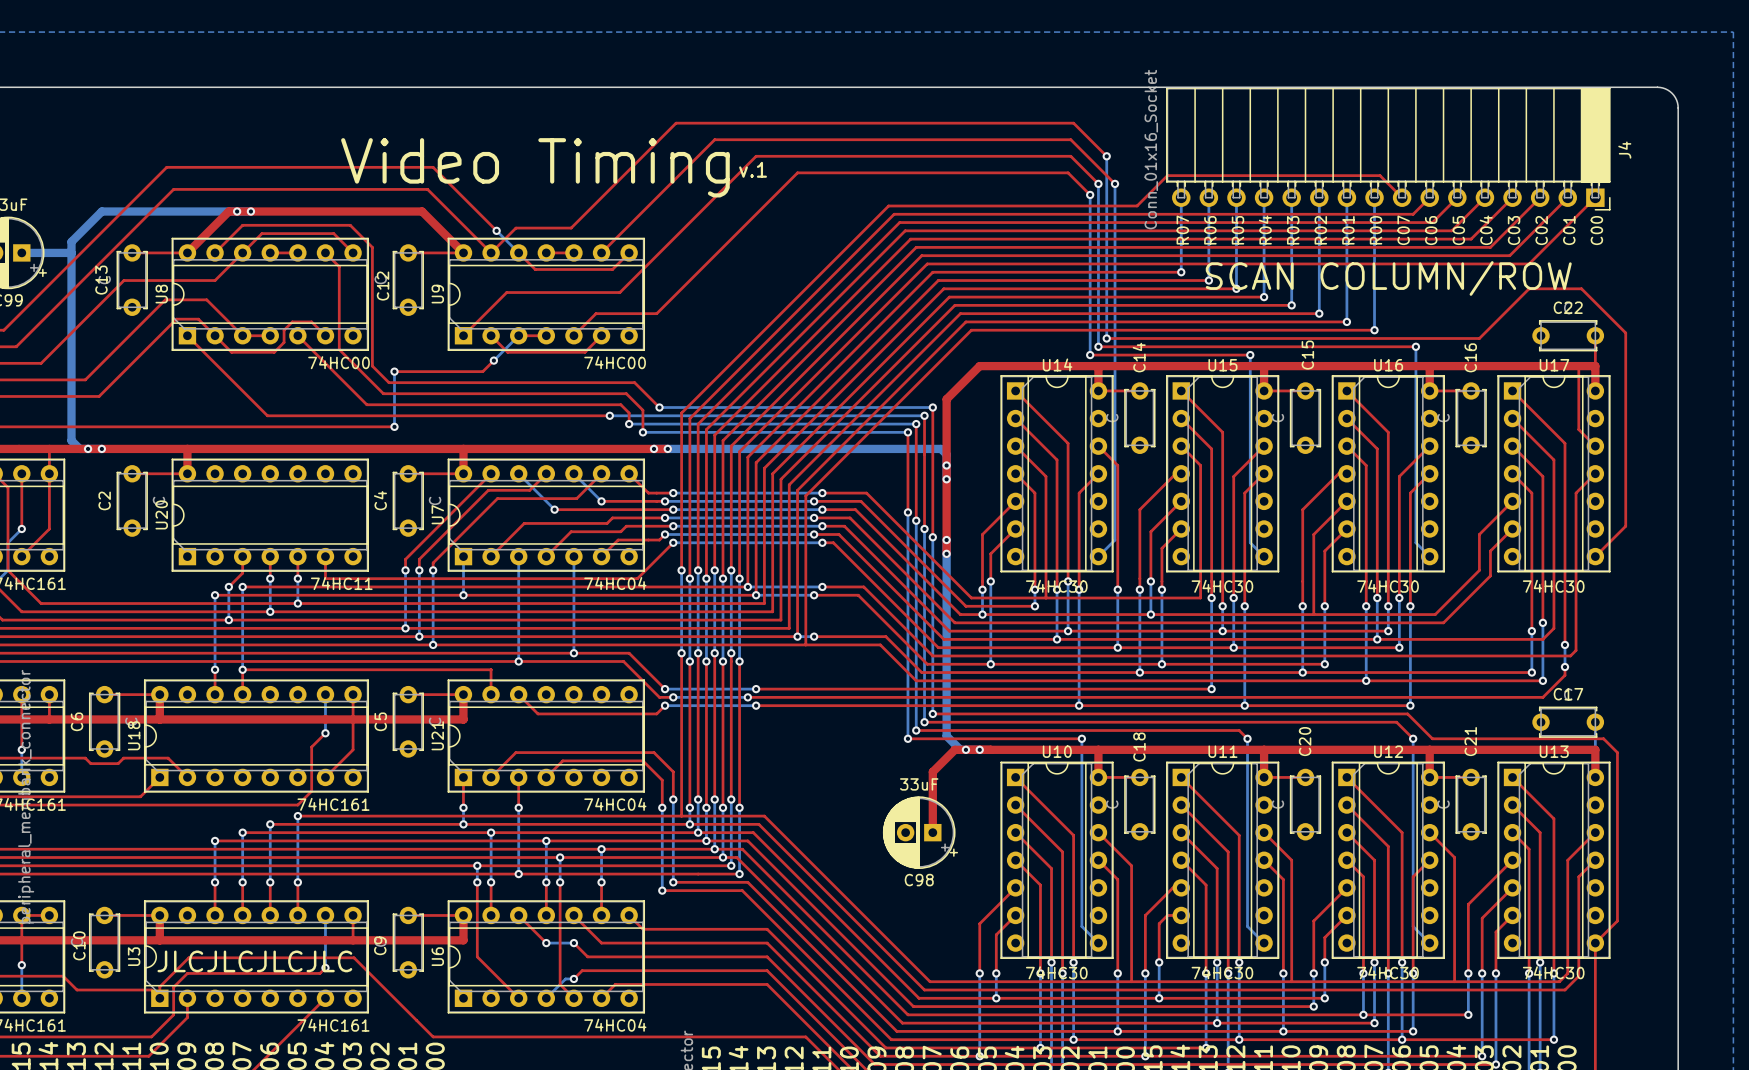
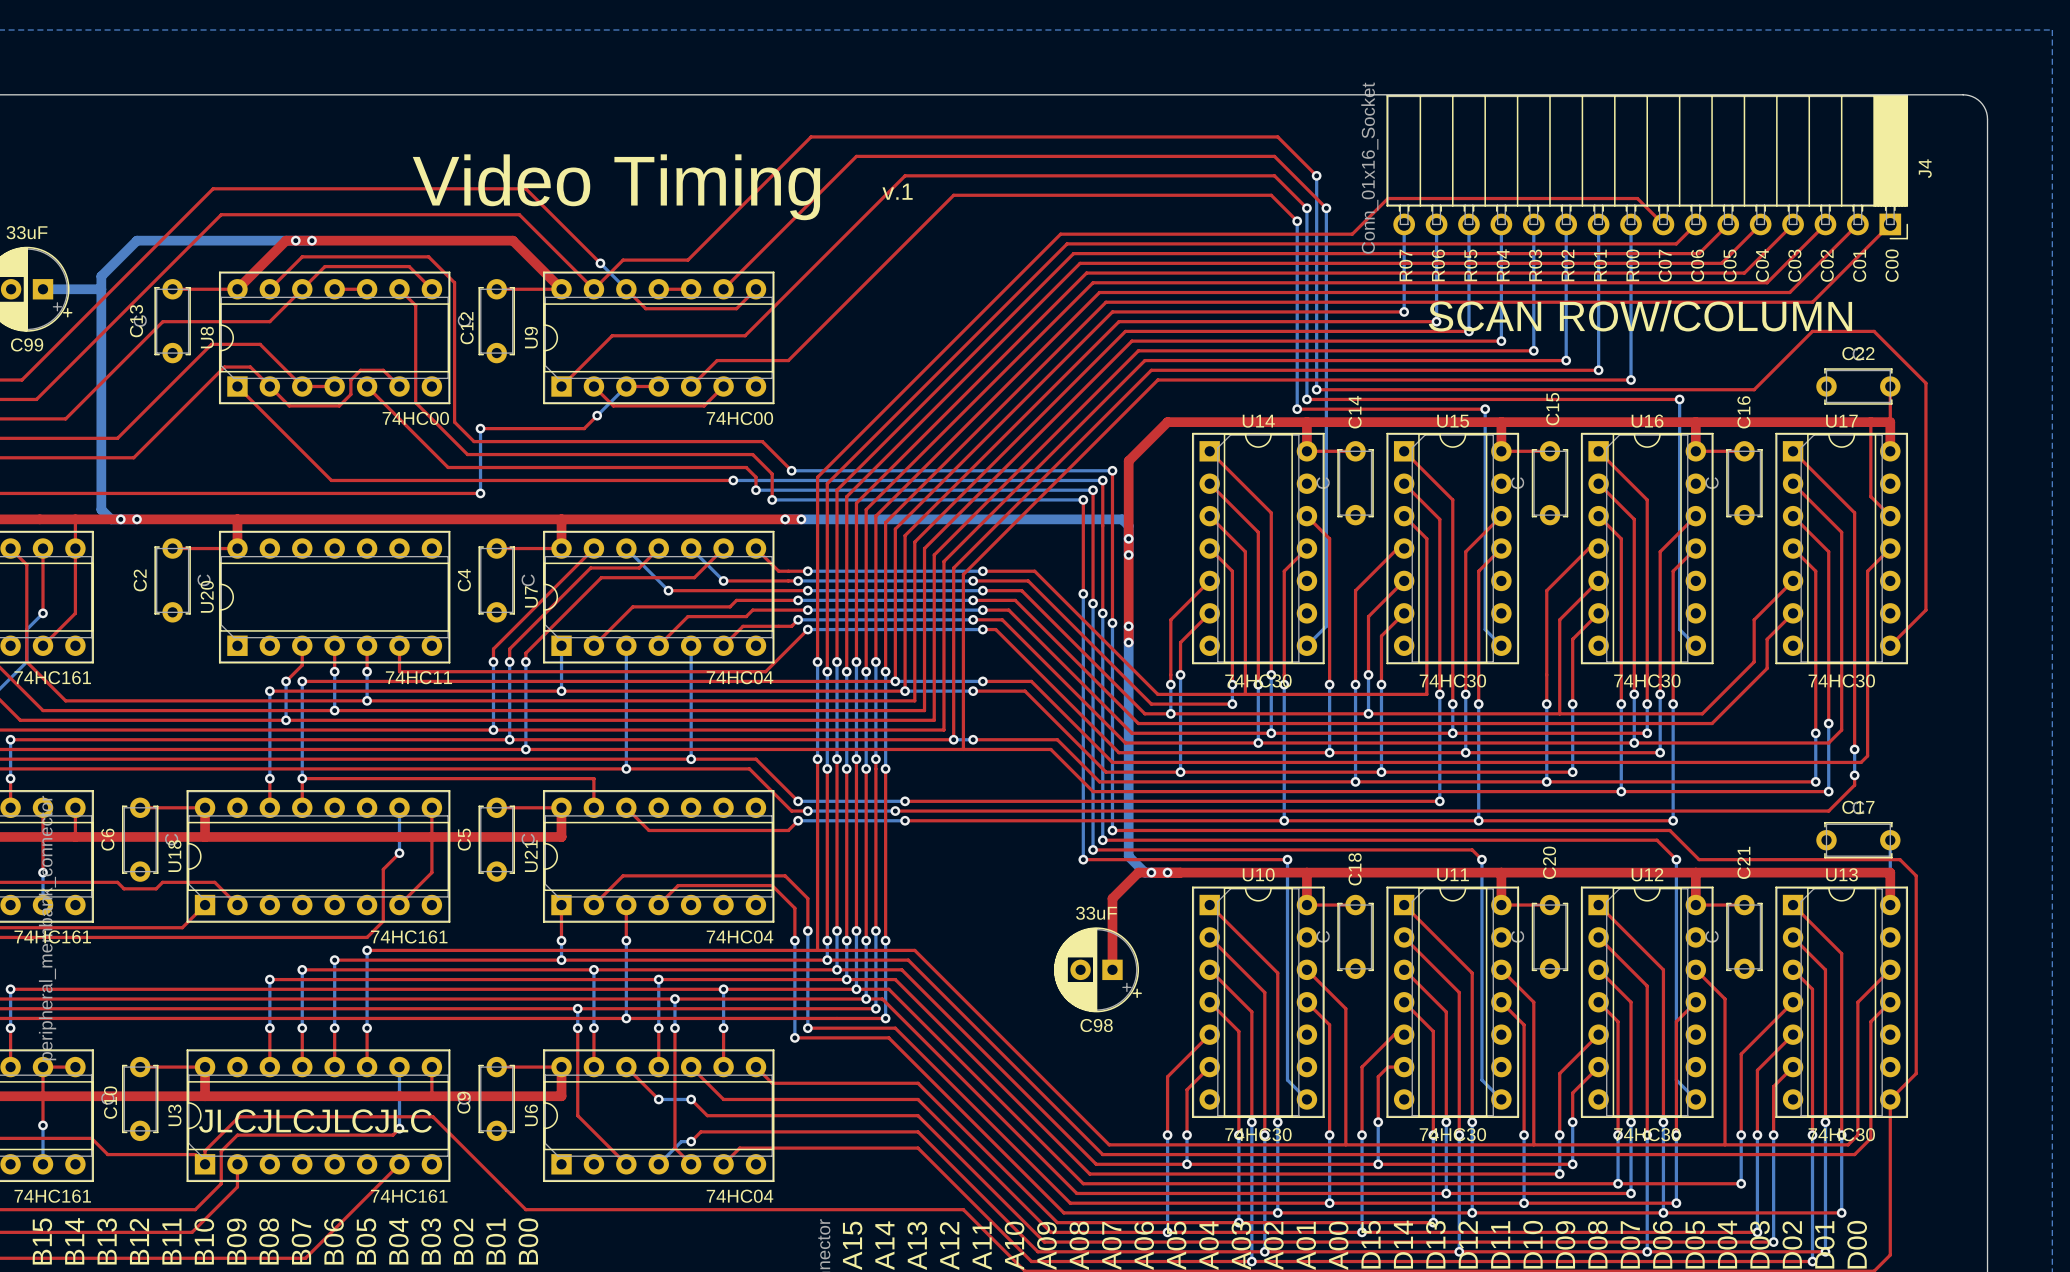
text: SCAN COLUMN/ROW (1388, 278) -> SCAN ROW/COLUMN (1640, 315)

